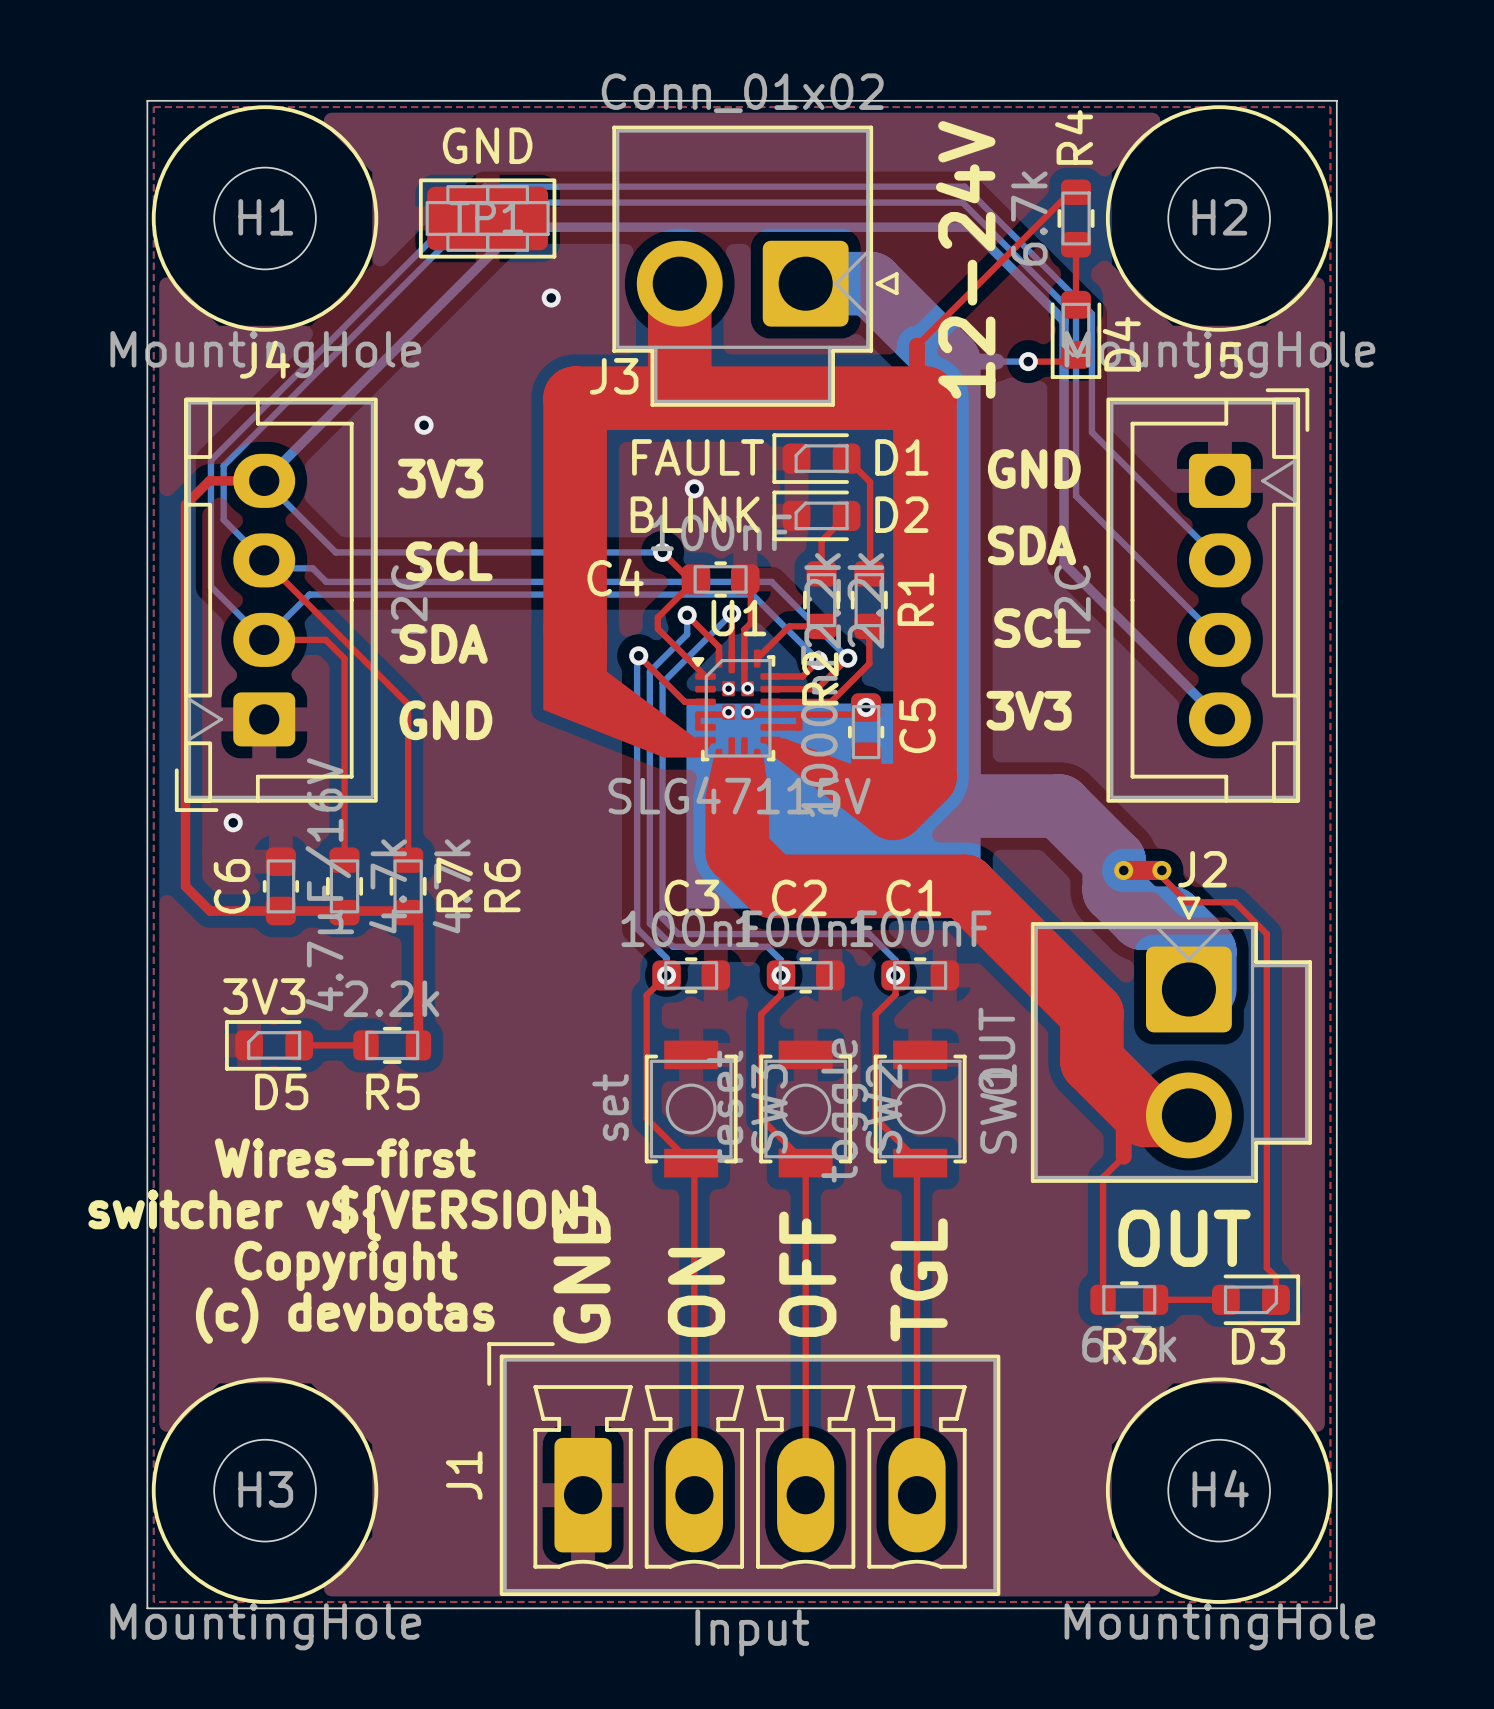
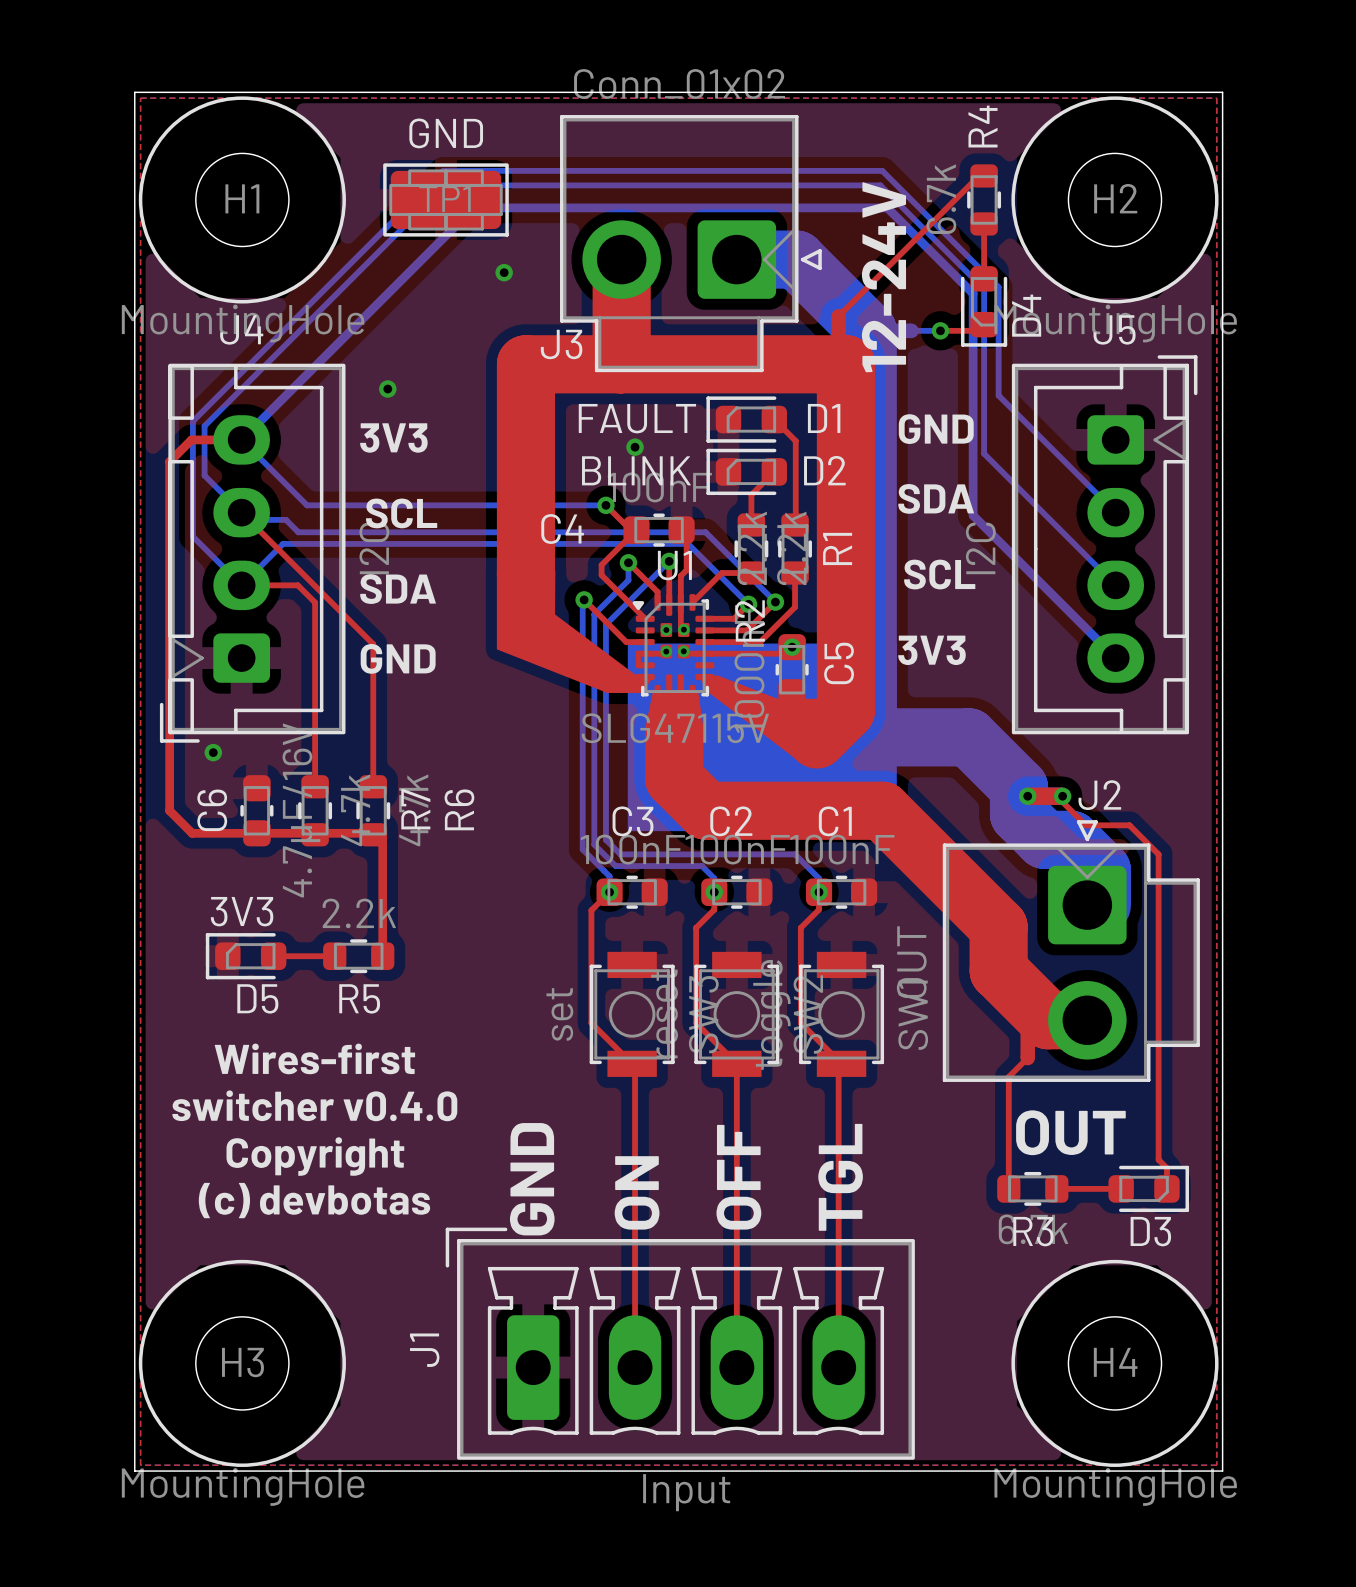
drawing: [780, 711, 803, 731] -> none
text: switcher v${VERSION} (344, 1213) -> switcher v0.4.0 (314, 1105)

